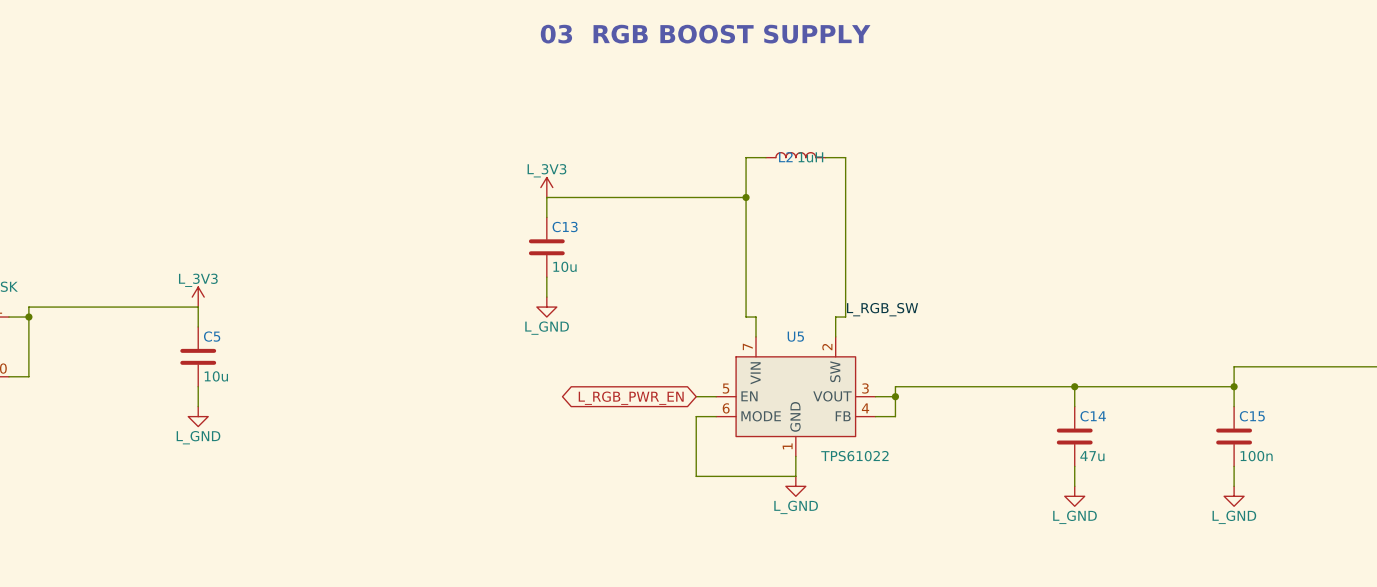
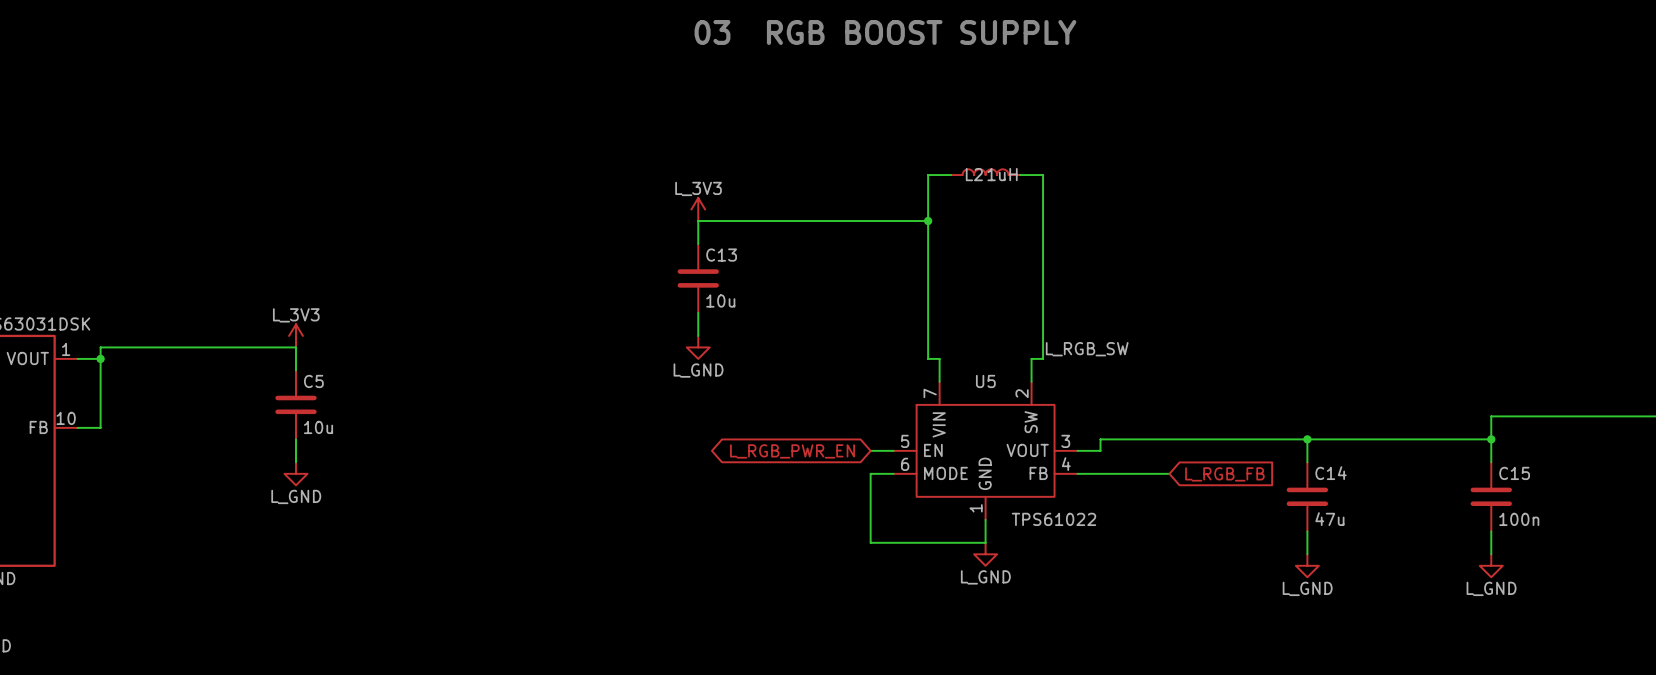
wire: (895, 396) (895, 416) -> (1169, 473) (1100, 473)
junction: (895, 396) -> none
global label: none -> L_RGB_FB (1224, 474)

